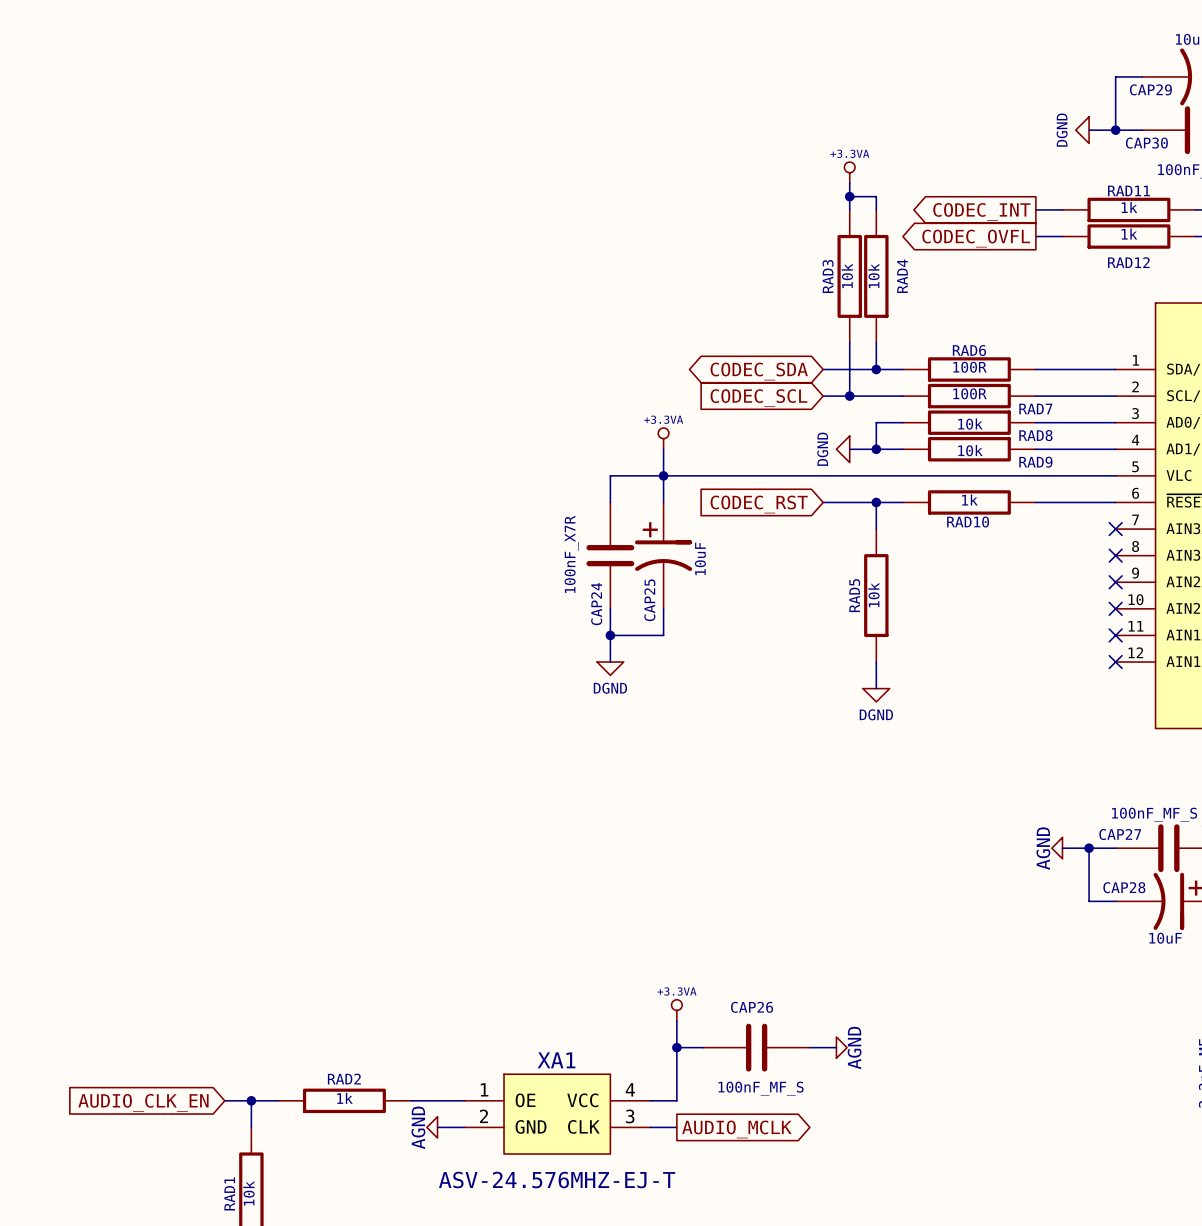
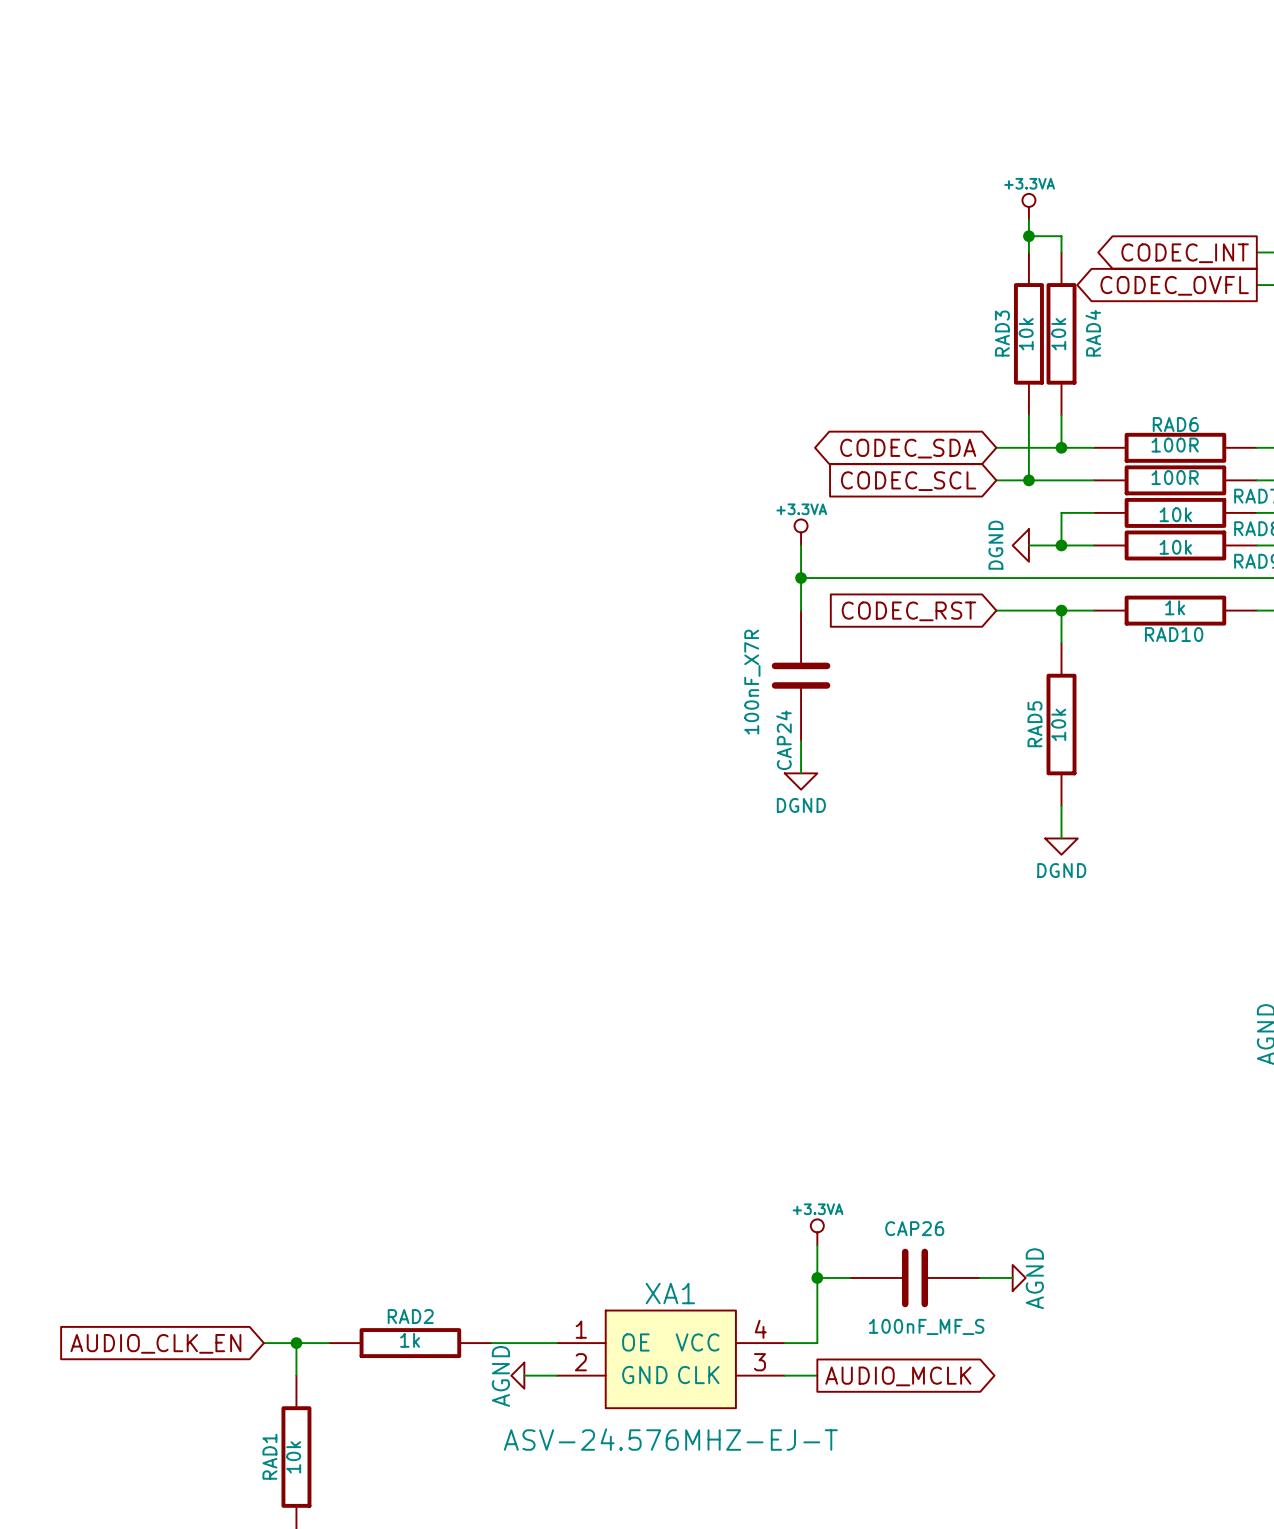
wire: (663, 475) (610, 475) (610, 502) -> none
CAP24 position: (610, 555) -> (801, 675)
CAP25: 10uF (663, 555) -> none
wire: (610, 608) (610, 662) -> none
wire: (610, 635) (663, 635) -> none
junction: (610, 635) -> none
power symbol position: DGND (610, 668) -> DGND (801, 781)

